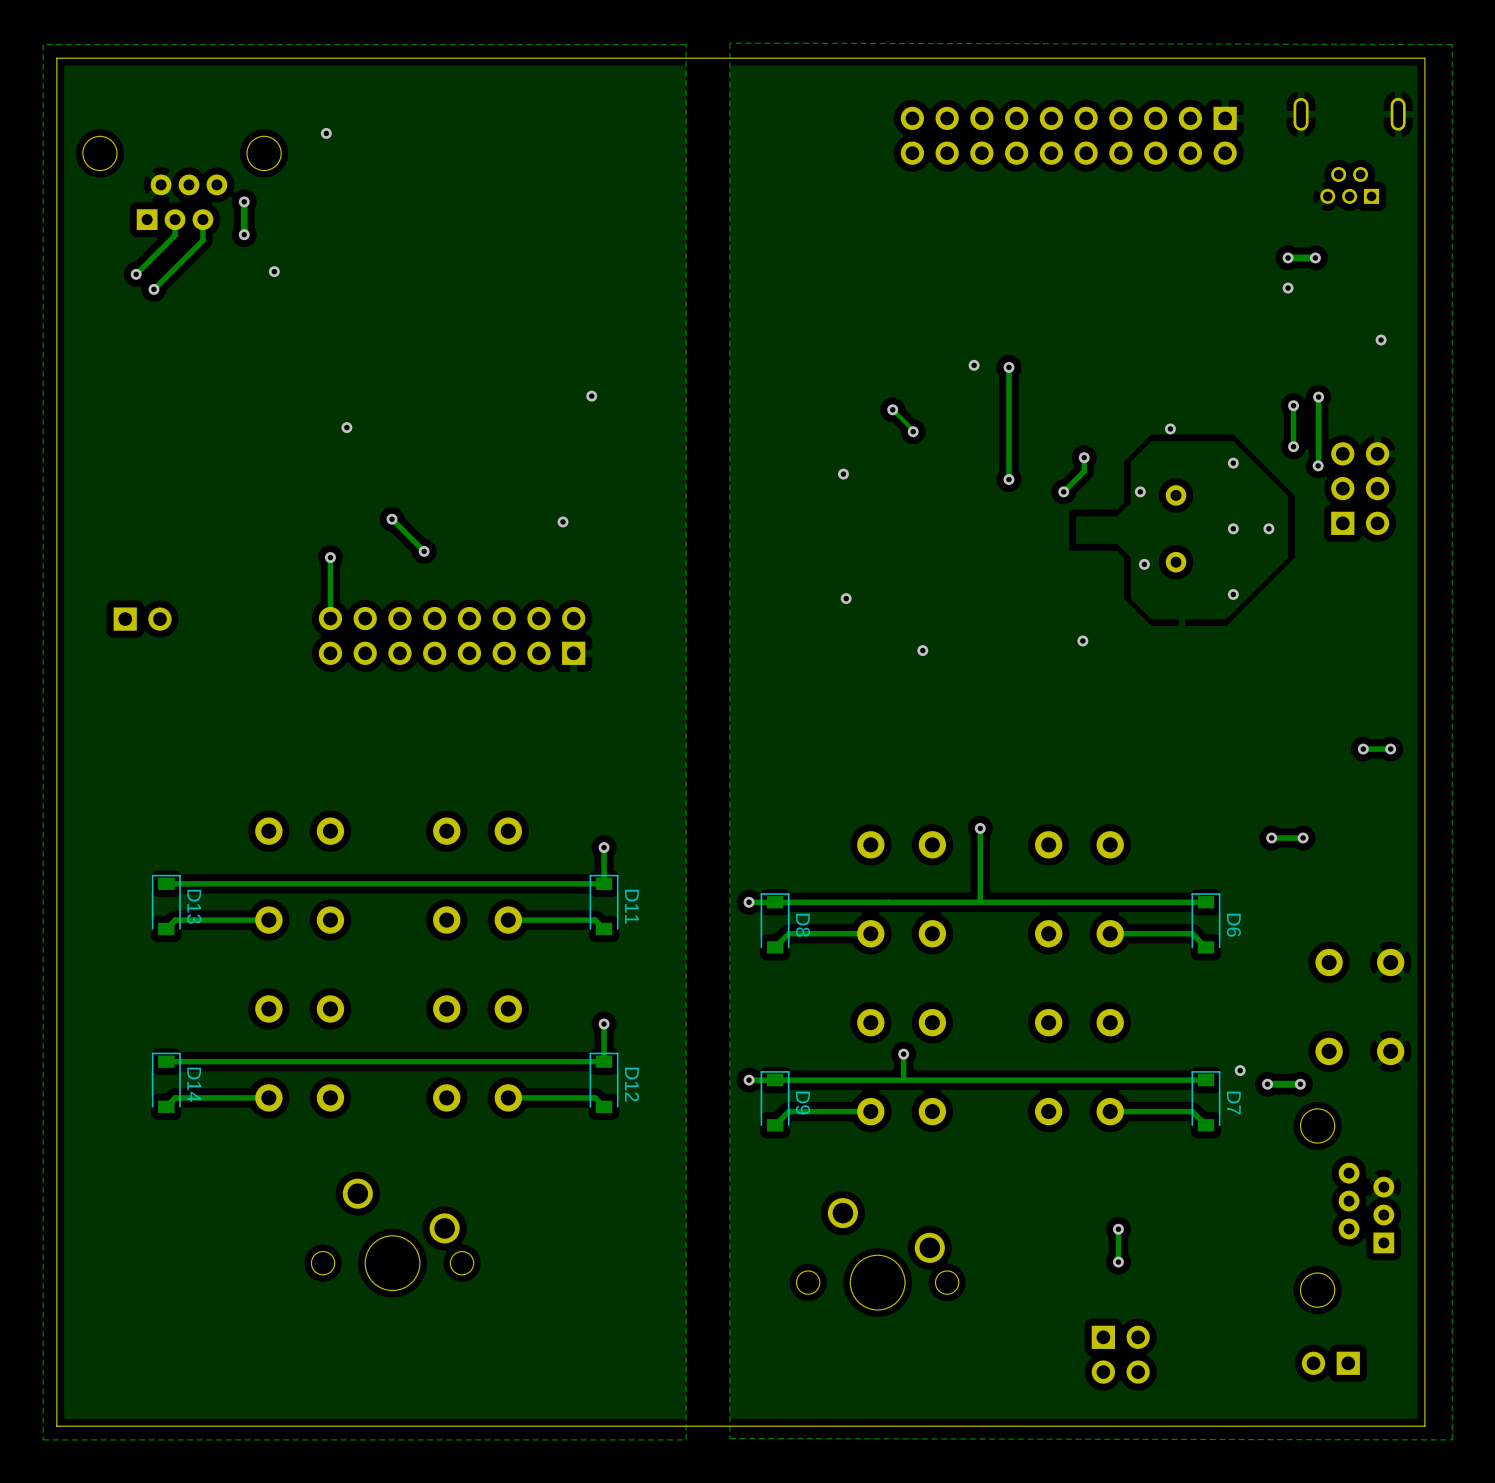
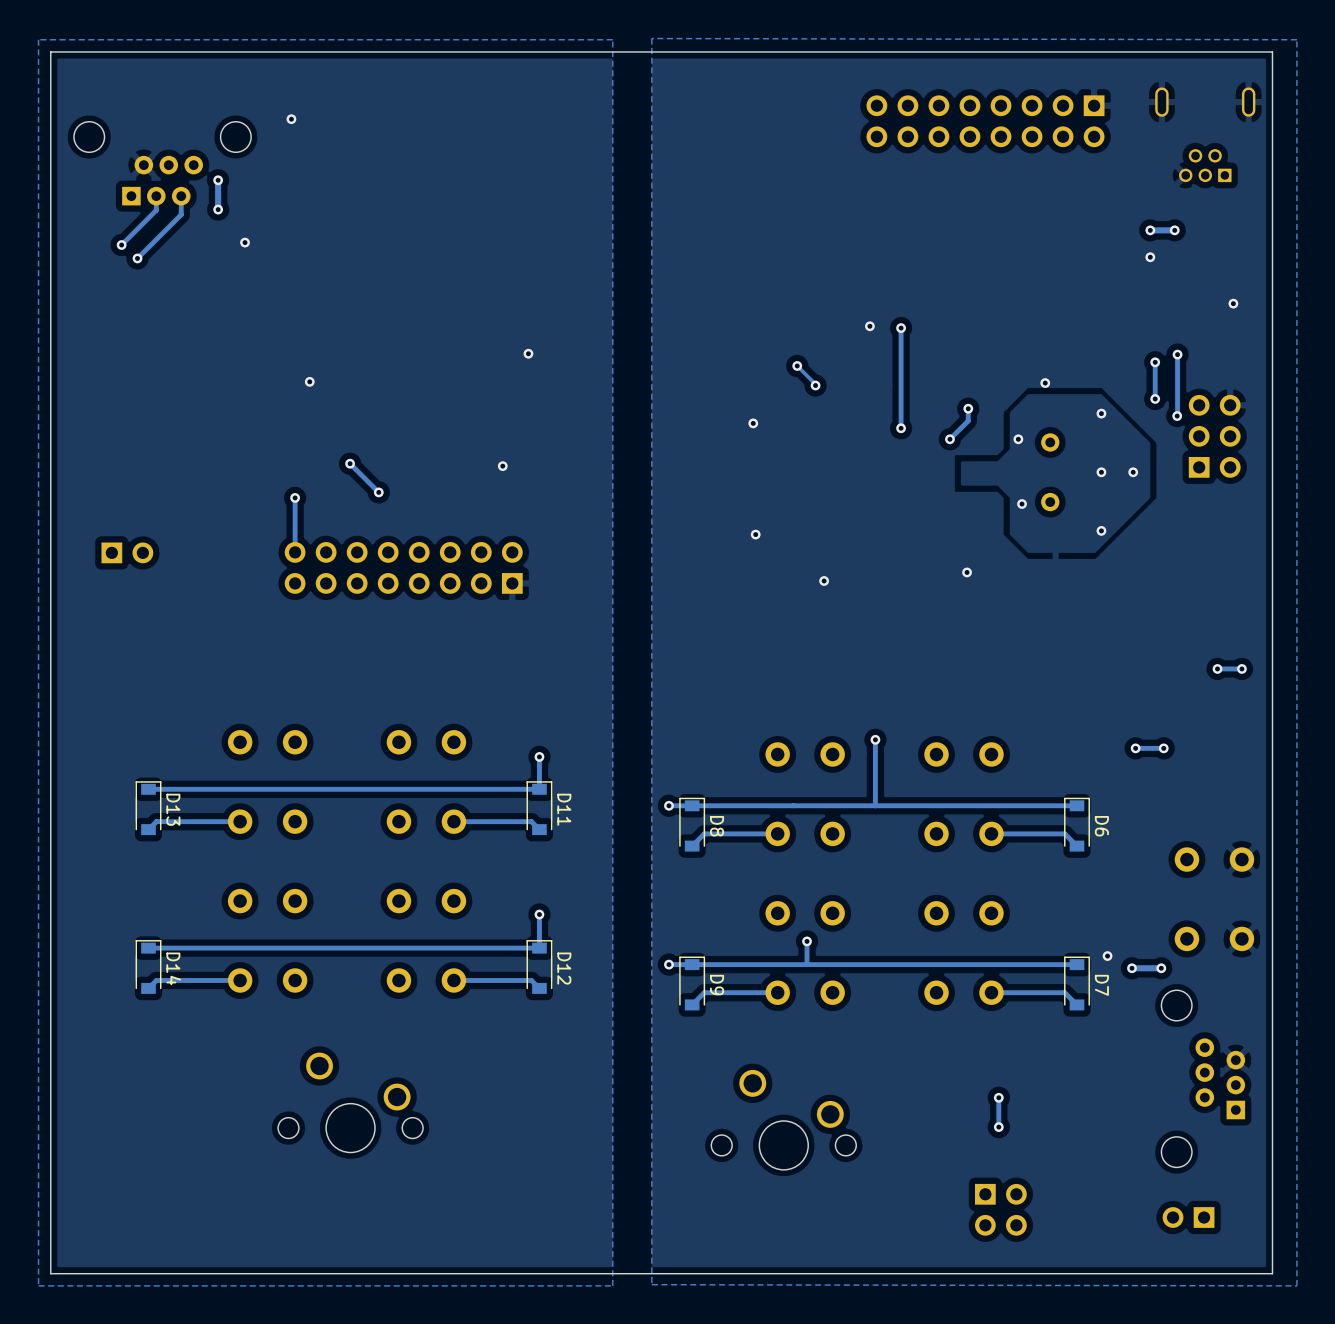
part: (1068, 135) -> none

